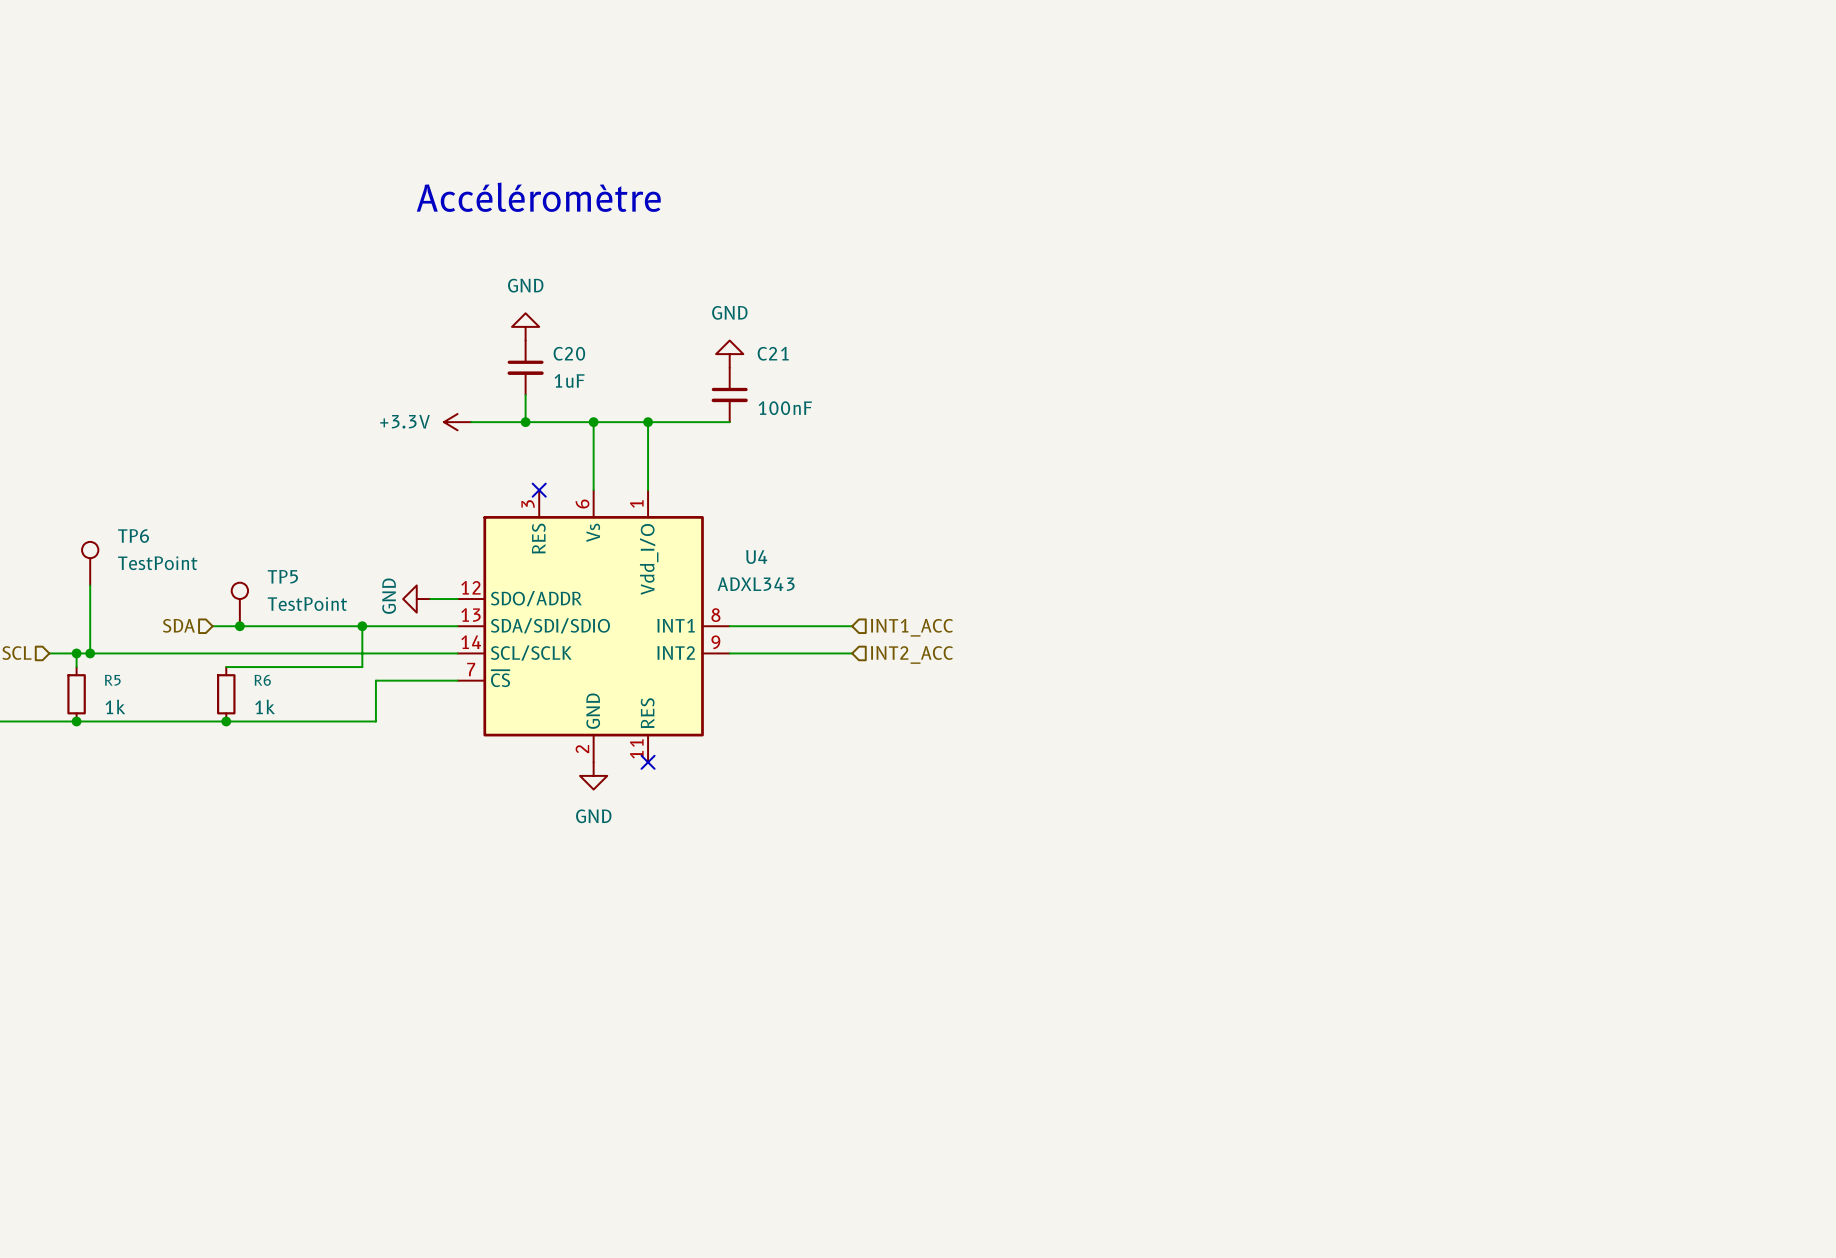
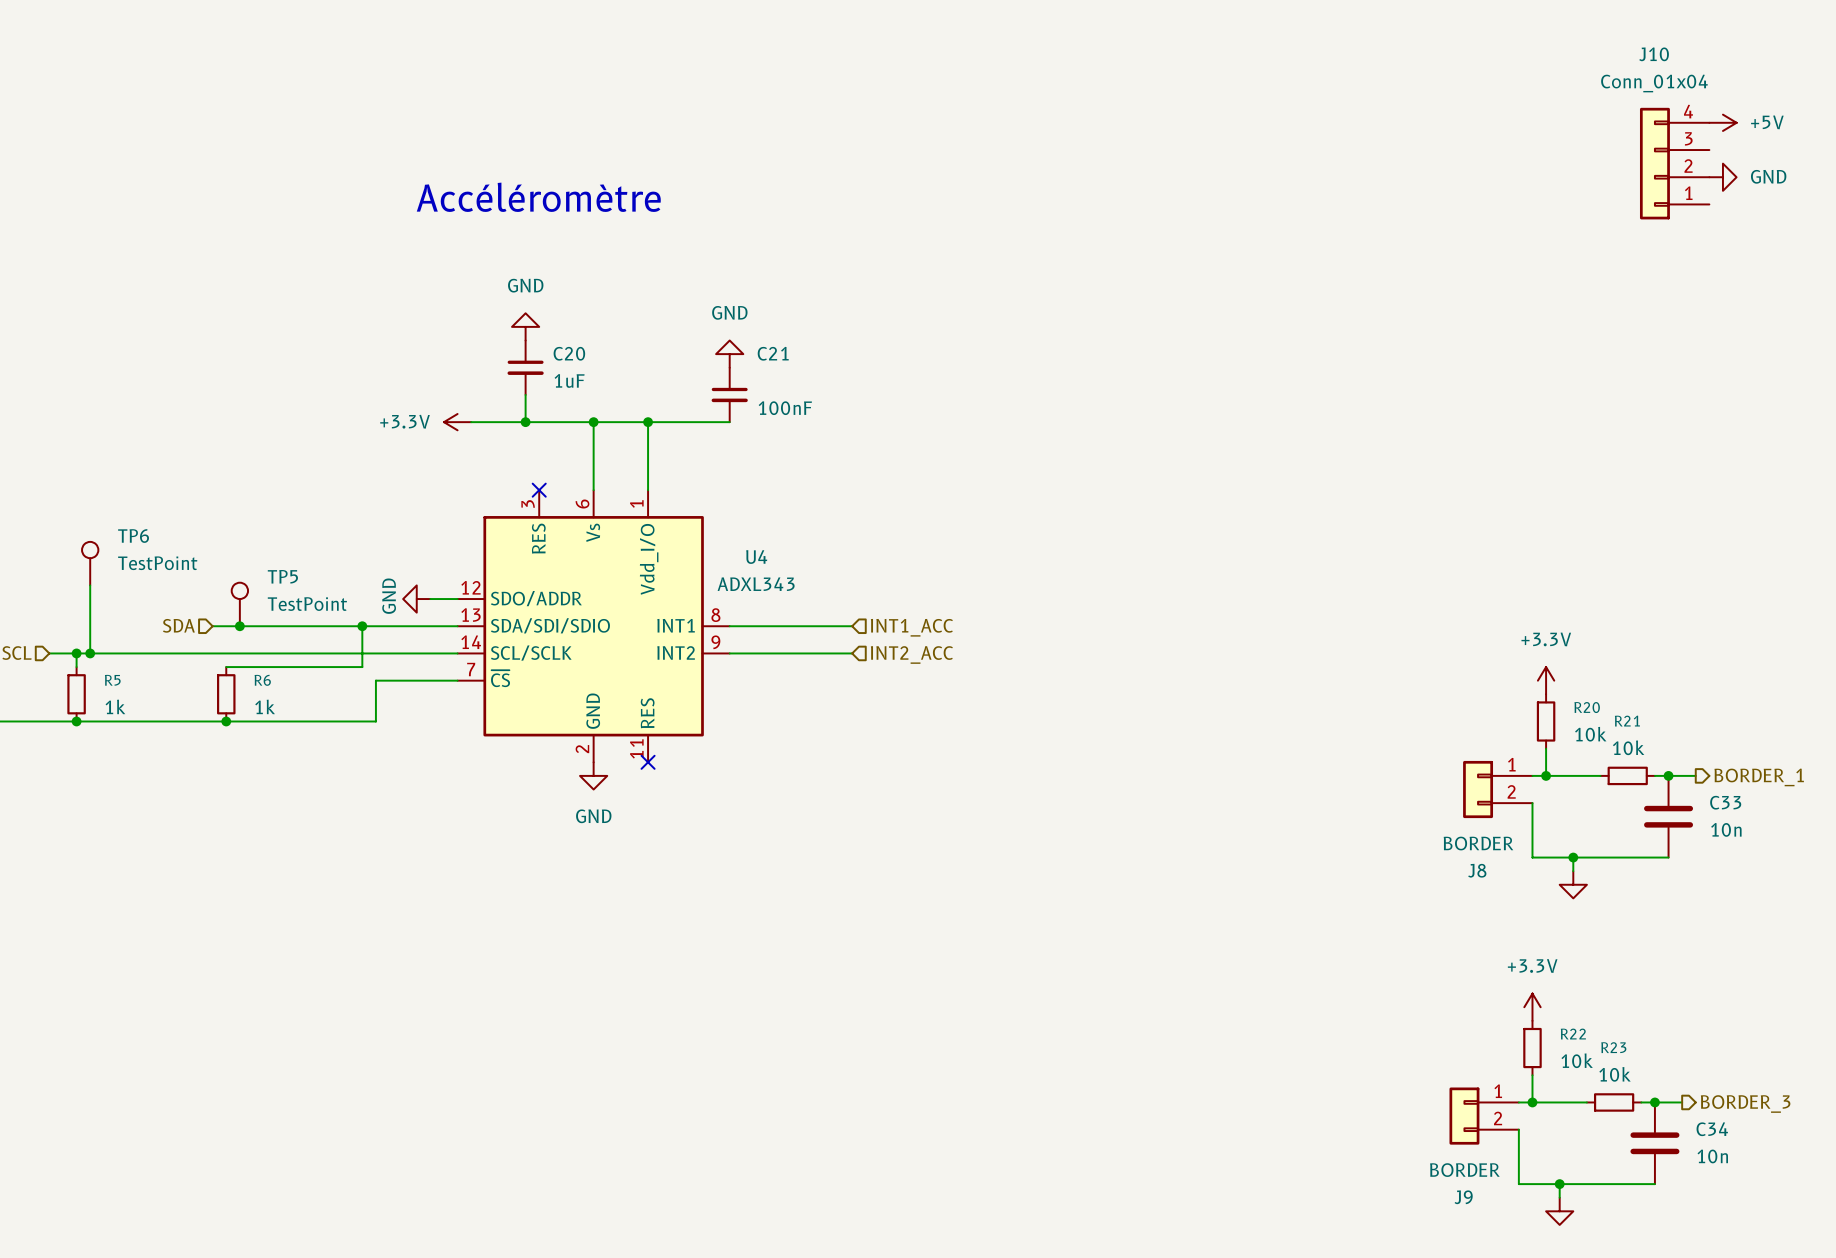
power symbol: none -> +5V (1722, 122)
J10: none -> Conn_01x04 (1674, 163)
power symbol: none -> GND (1722, 177)
power symbol: none -> +3.3V (1546, 680)
R20: none -> 10k (1546, 721)
wire: none -> (1546, 748) (1546, 775)
wire: none -> (1532, 775) (1600, 775)
junction: none -> (1546, 775)
R21: none -> 10k (1627, 775)
wire: none -> (1654, 775) (1695, 775)
junction: none -> (1668, 775)
hierarchical label: none -> BORDER_1 (1759, 777)
J8: none -> BORDER (1497, 789)
wire: none -> (1532, 803) (1532, 857) (1668, 857)
C33: none -> 10n (1668, 816)
wire: none -> (1573, 857) (1573, 871)
junction: none -> (1573, 857)
power symbol: none -> (1573, 884)
power symbol: none -> +3.3V (1532, 1007)
R22: none -> 10k (1532, 1048)
wire: none -> (1532, 1075) (1532, 1102)
wire: none -> (1518, 1102) (1586, 1102)
junction: none -> (1532, 1102)
R23: none -> 10k (1614, 1102)
wire: none -> (1641, 1102) (1682, 1102)
junction: none -> (1654, 1102)
hierarchical label: none -> BORDER_3 (1745, 1104)
J9: none -> BORDER (1484, 1116)
wire: none -> (1518, 1129) (1518, 1184) (1654, 1184)
C34: none -> 10n (1654, 1143)
wire: none -> (1559, 1184) (1559, 1197)
junction: none -> (1559, 1184)
power symbol: none -> (1559, 1211)

